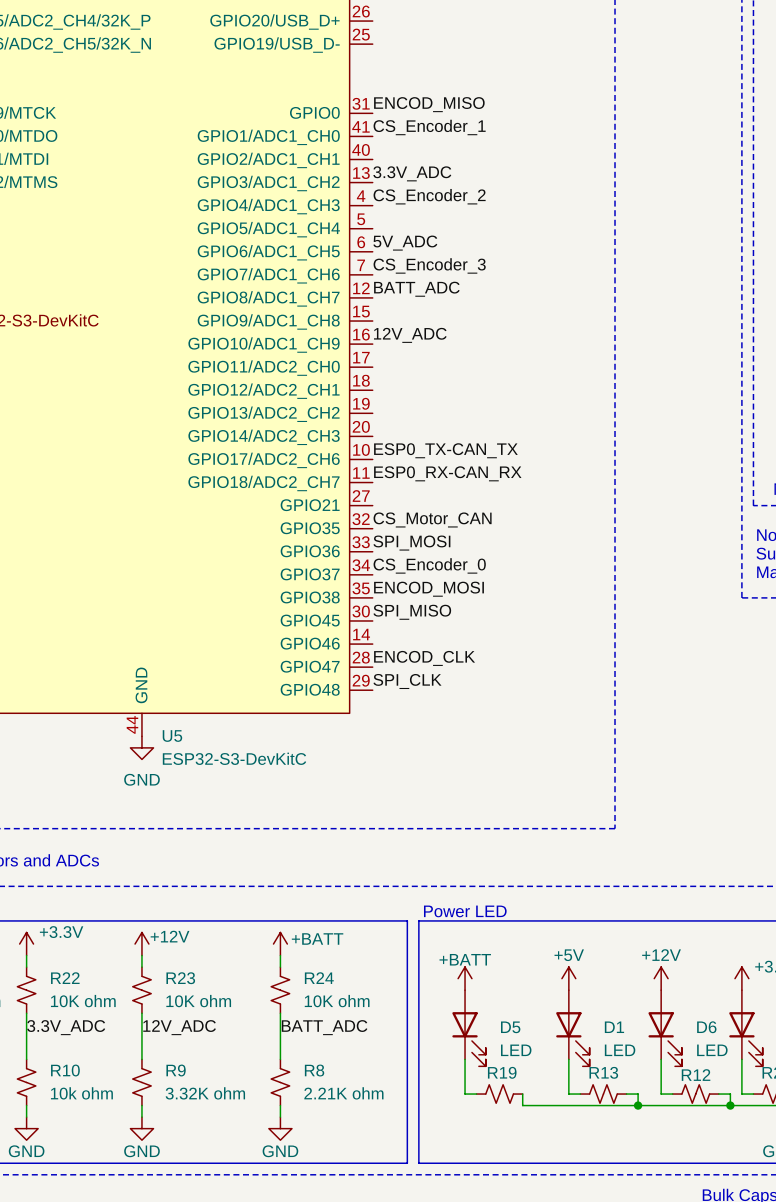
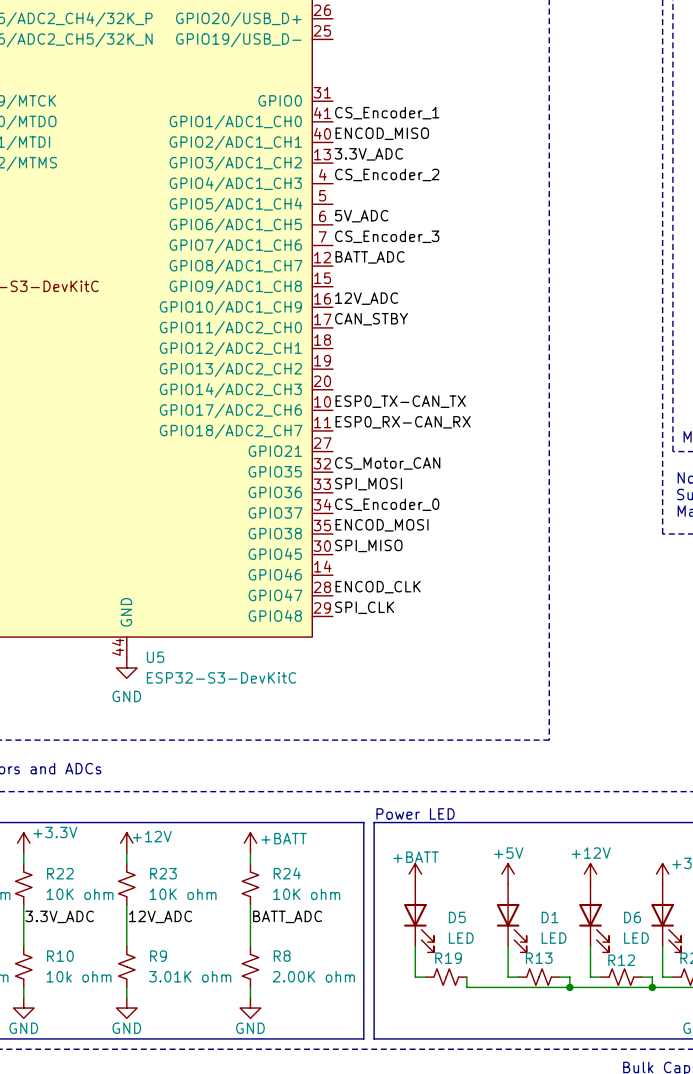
label position: ENCOD_MISO (429, 104) -> ENCOD_MISO (382, 133)
label: none -> CAN_STBY (371, 319)
R9 value: 3.32K ohm (205, 1093) -> 3.01K ohm (190, 976)
R8 value: 2.21K ohm (343, 1093) -> 2.00K ohm (313, 976)

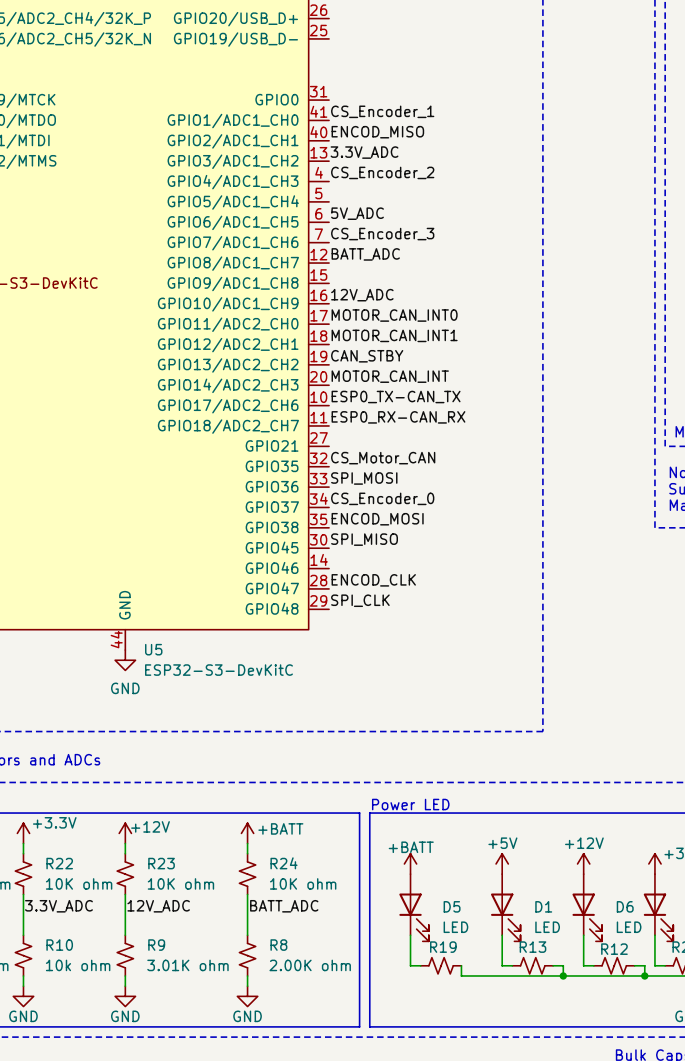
label: CAN_STBY (371, 319) -> MOTOR_CAN_INT0 (394, 315)
label: none -> MOTOR_CAN_INT1 (394, 335)
label: none -> CAN_STBY (367, 356)
label: none -> MOTOR_CAN_INT (390, 376)

